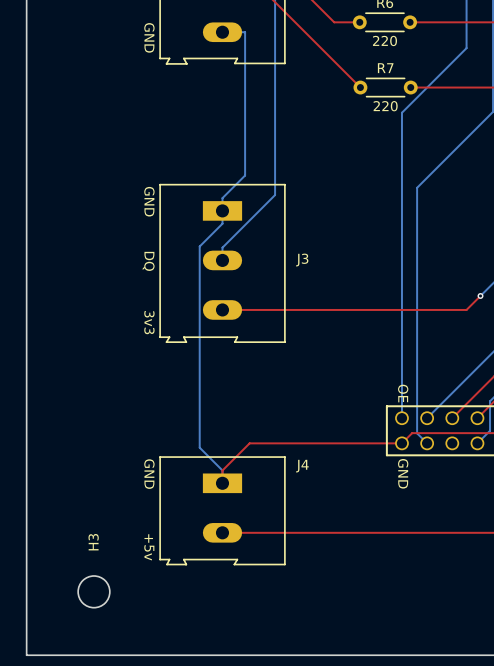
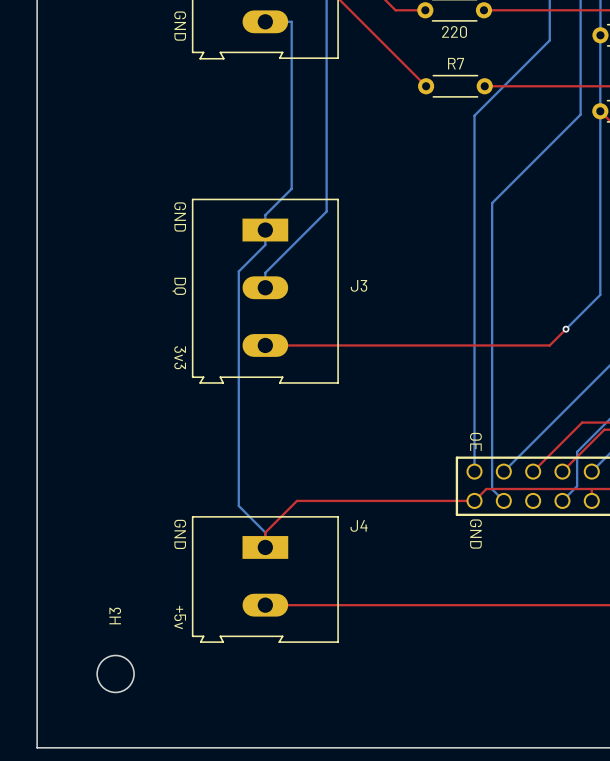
R7 value: 220 (385, 106) -> none

